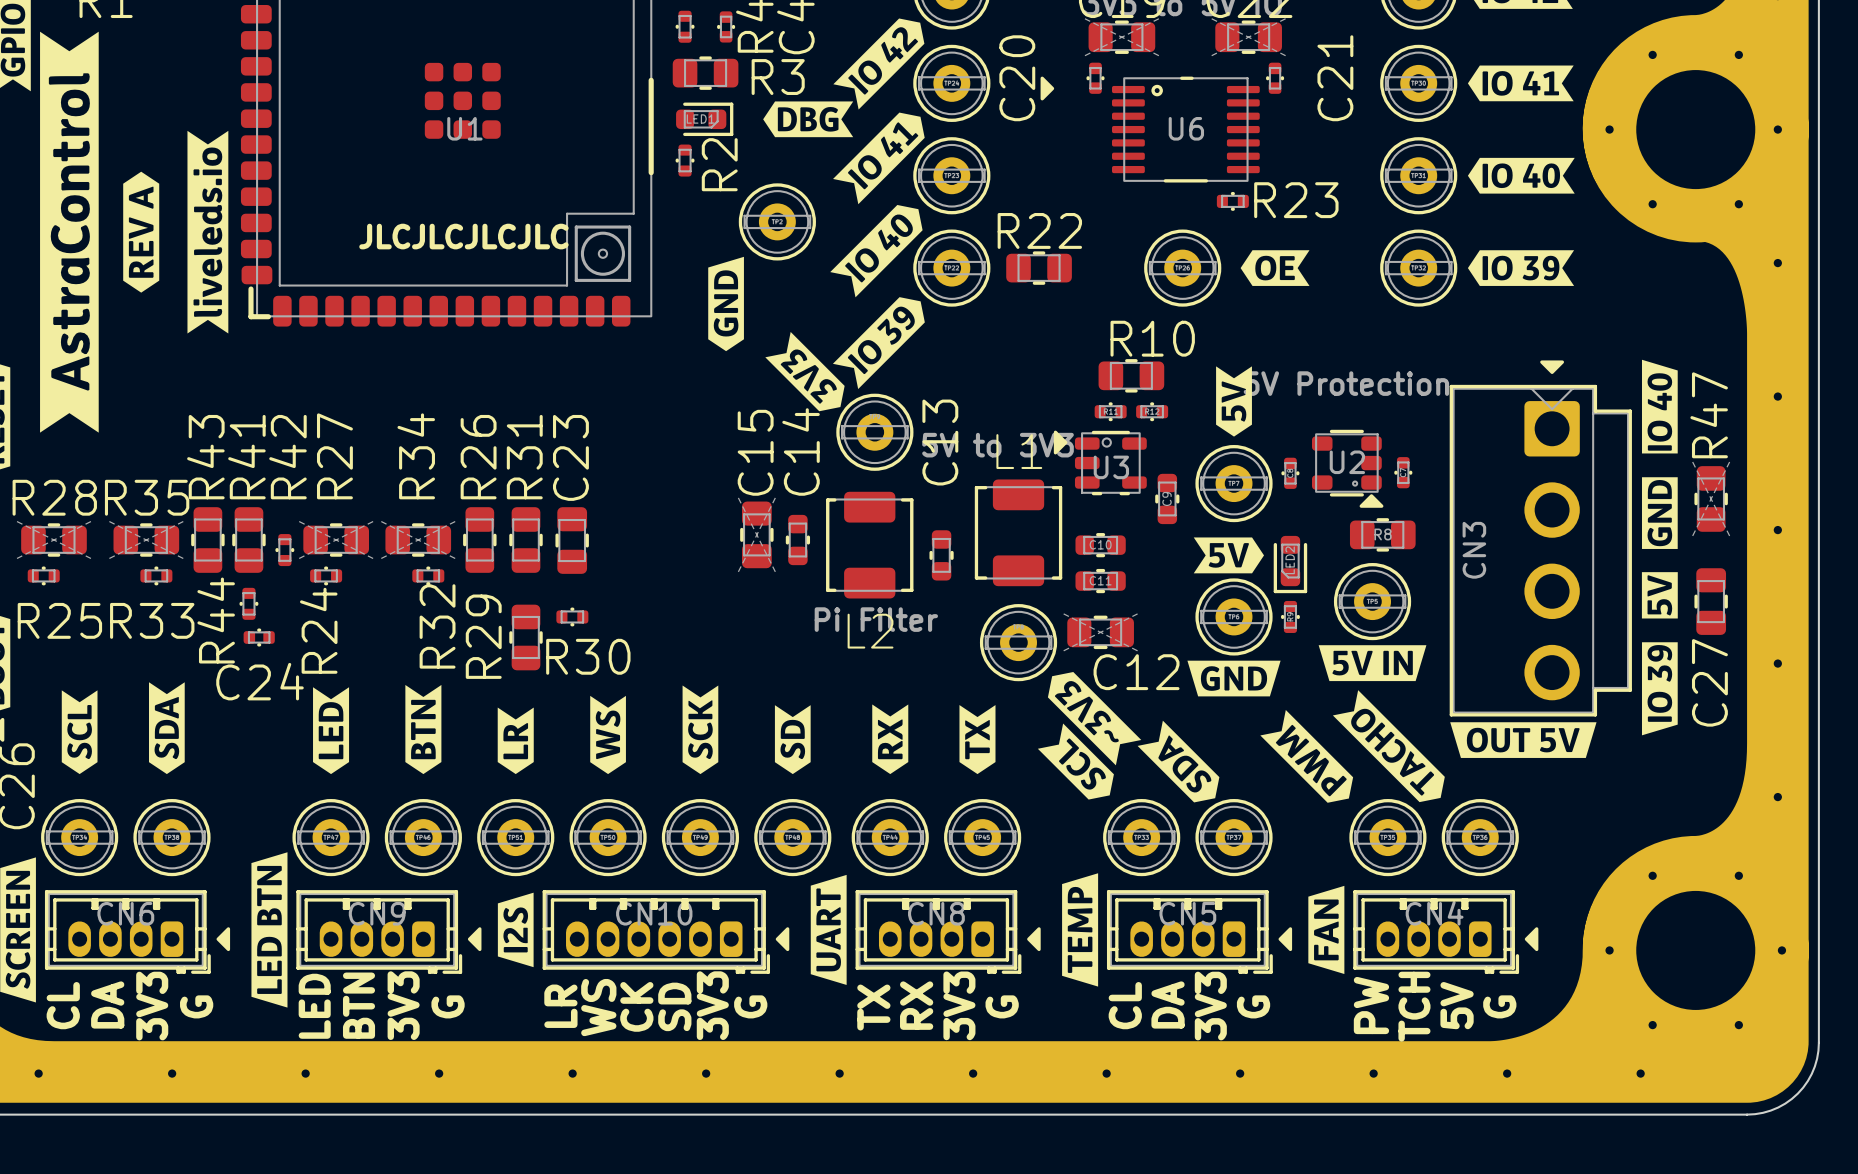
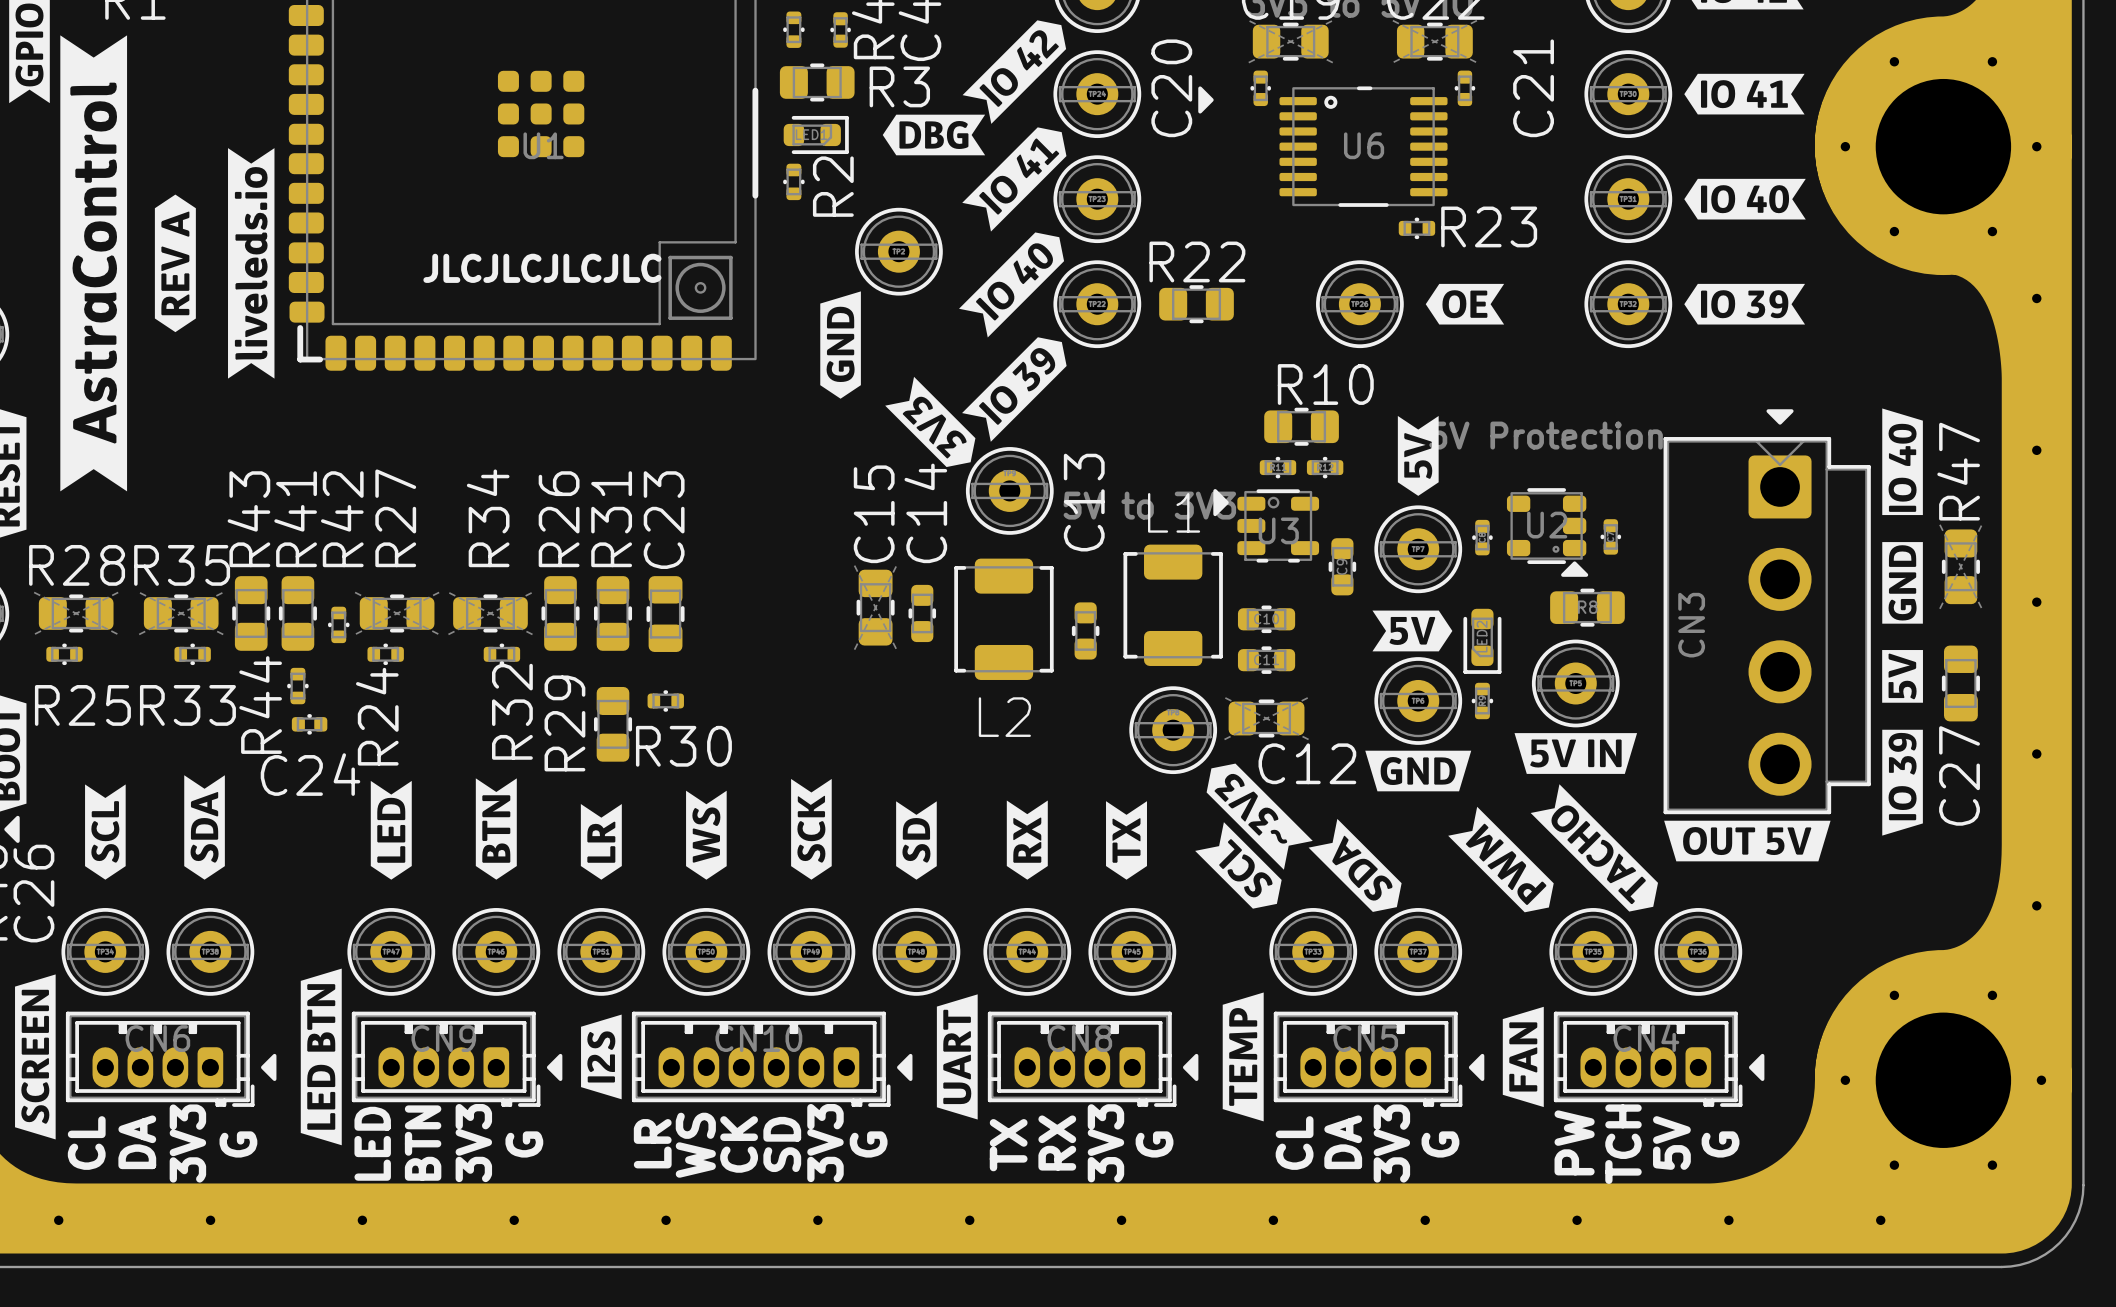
text: Pi Filter (876, 619) -> none

